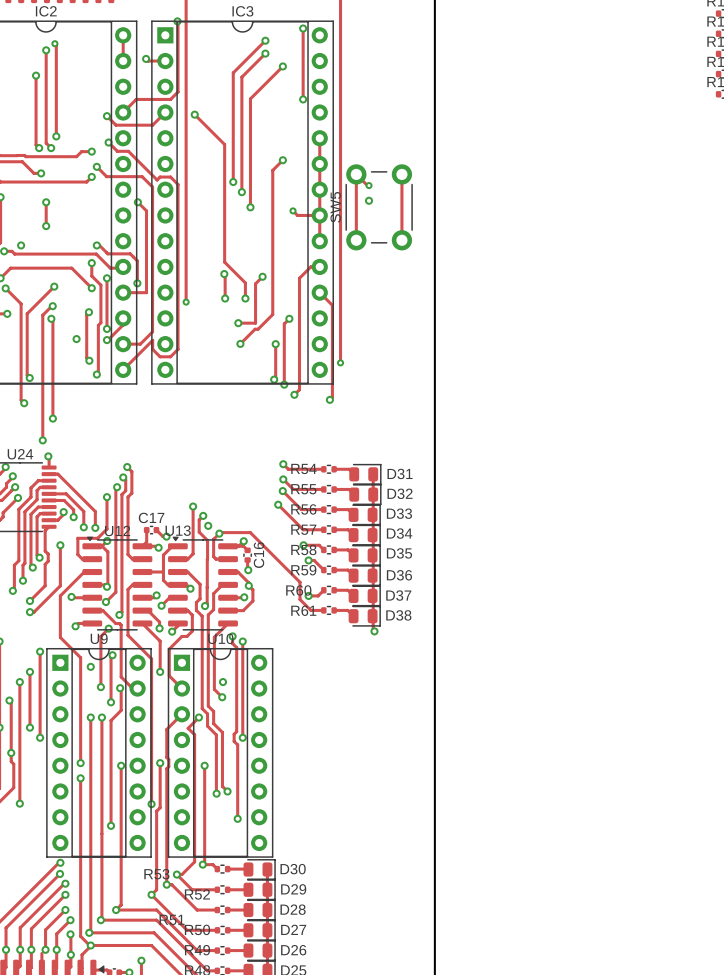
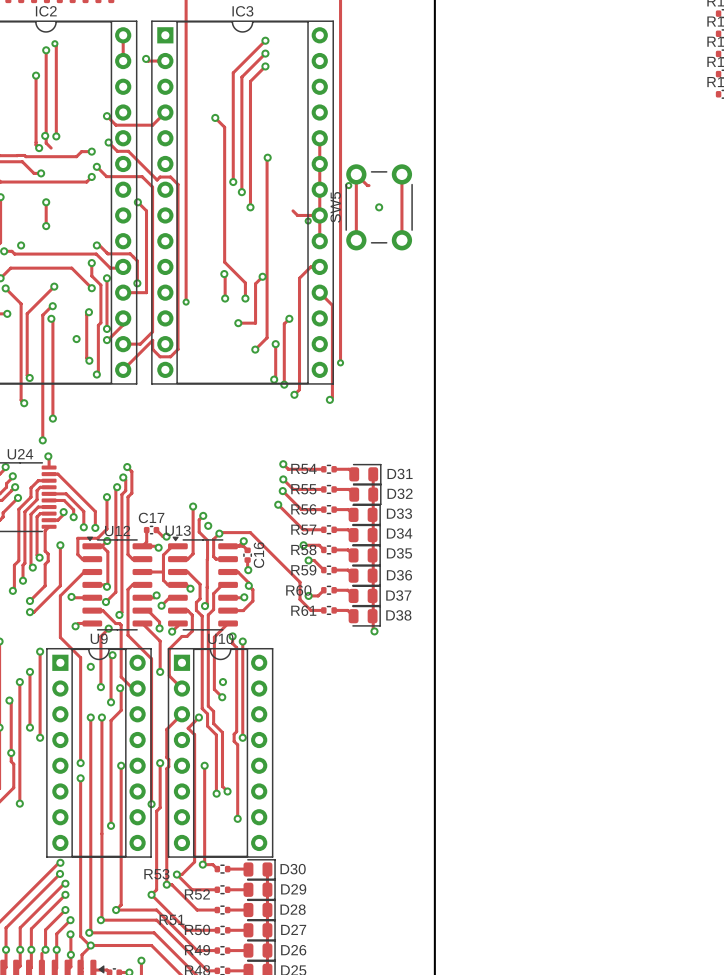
track: (177, 21) (178, 92) (170, 99) (136, 99) (123, 112) -> none
via: (177, 21) -> none
track: (303, 28) (303, 99) -> none
via: (303, 28) -> none
track: (282, 66) (250, 98) -> (265, 66) (250, 81) (250, 98)
via position: (282, 66) -> (265, 66)
via: (303, 99) -> none
track: (194, 114) (224, 144) -> (215, 117) (224, 127) (224, 144)
via position: (194, 114) -> (215, 117)
via position: (51, 148) -> (45, 135)
track: none -> (267, 157) (267, 337) (255, 349)
track: (282, 160) (272, 170) (272, 314) (240, 343) -> none
via position: (282, 160) -> (267, 157)
via position: (369, 185) -> (348, 185)
via position: (369, 200) -> (379, 207)
via position: (293, 210) -> (308, 221)
via position: (240, 343) -> (255, 349)

